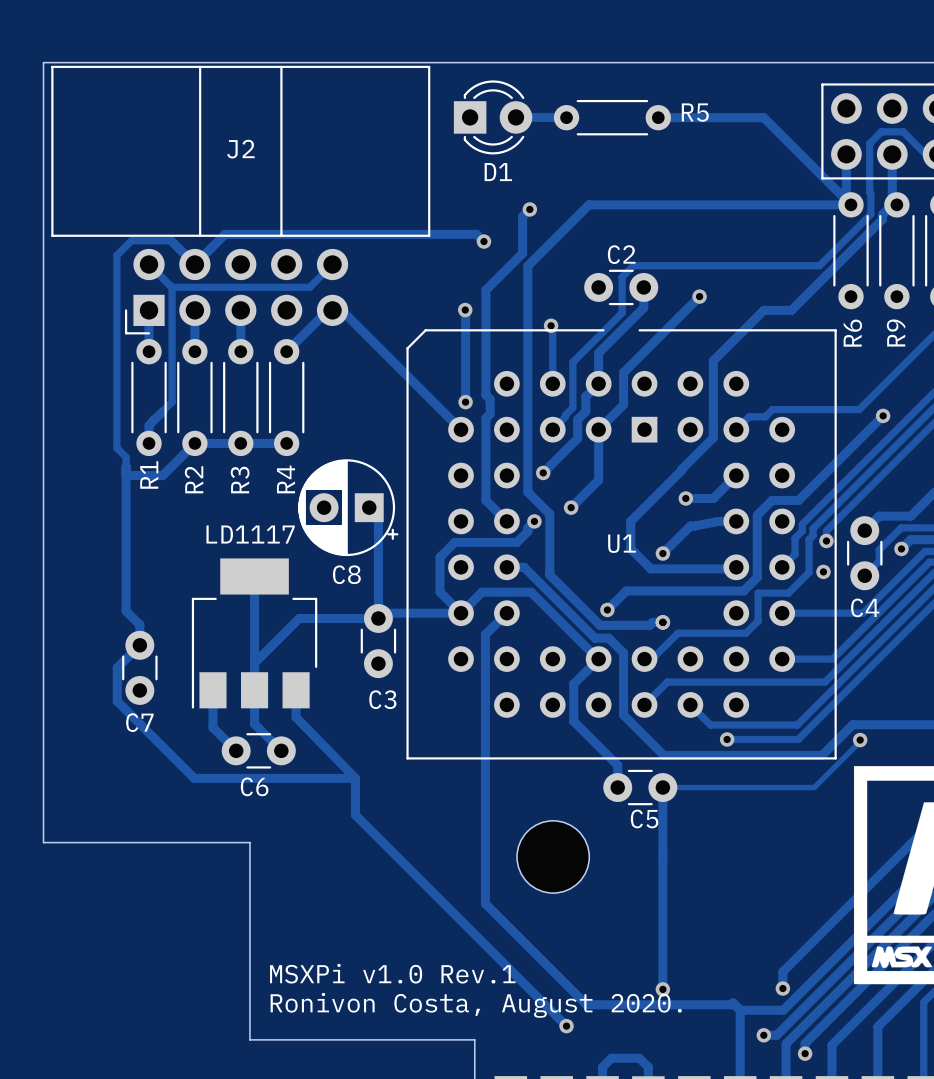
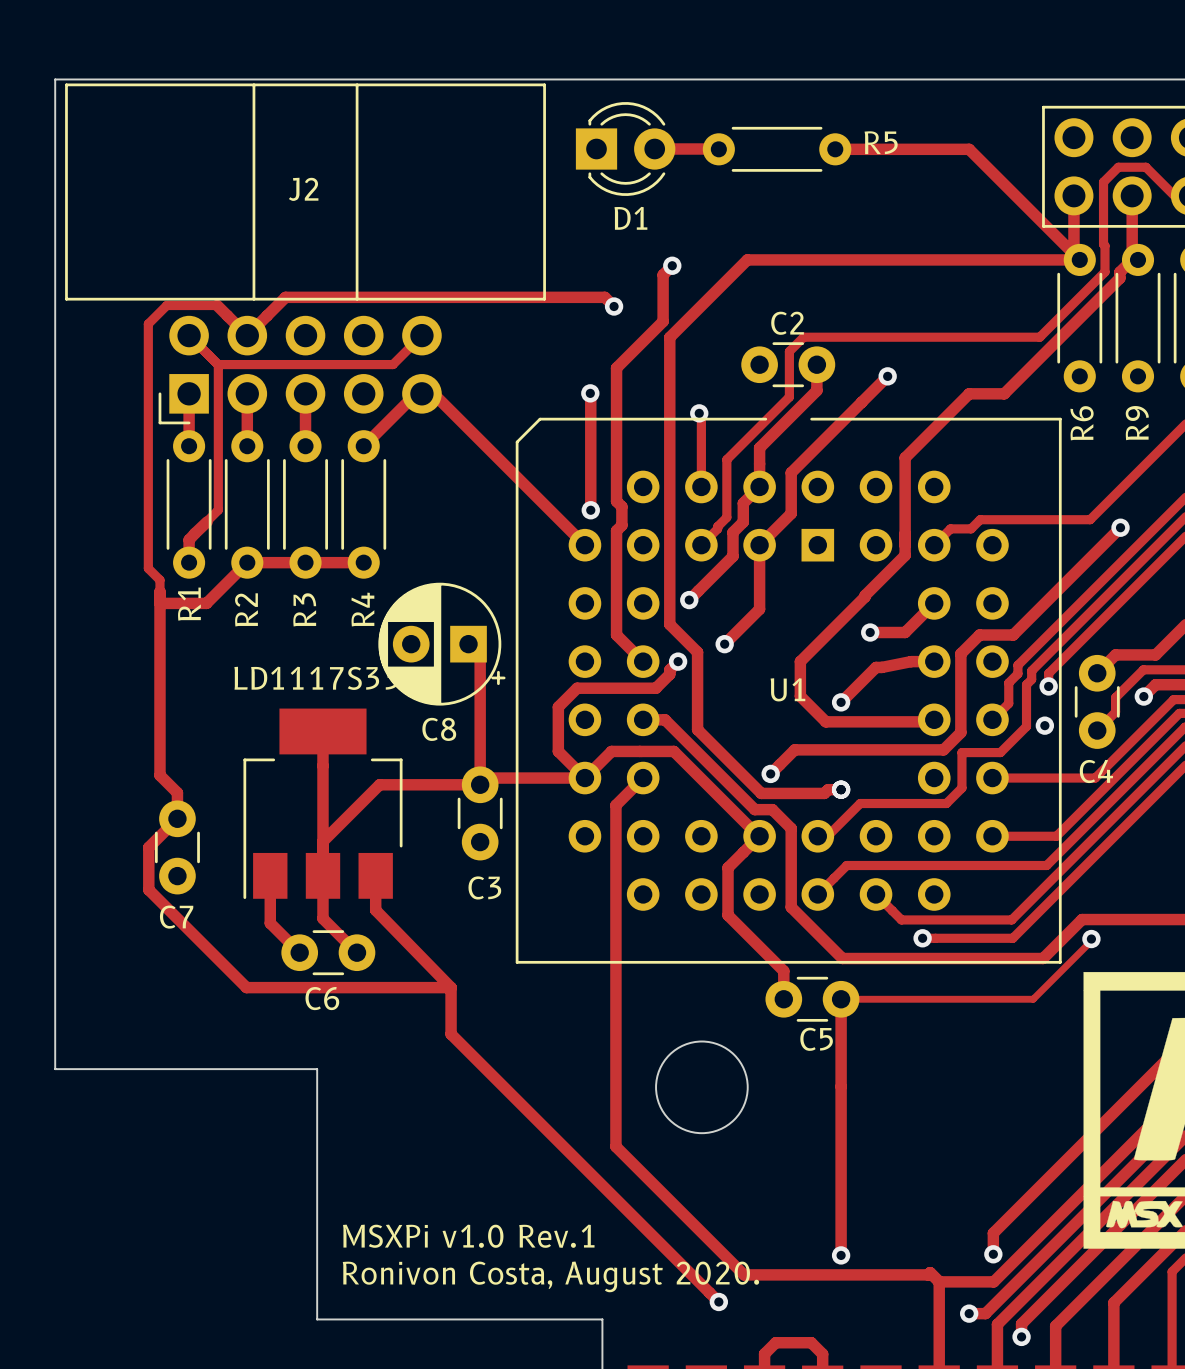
LD1117 name: LD1117 (250, 534) -> LD1117S33 (316, 678)

